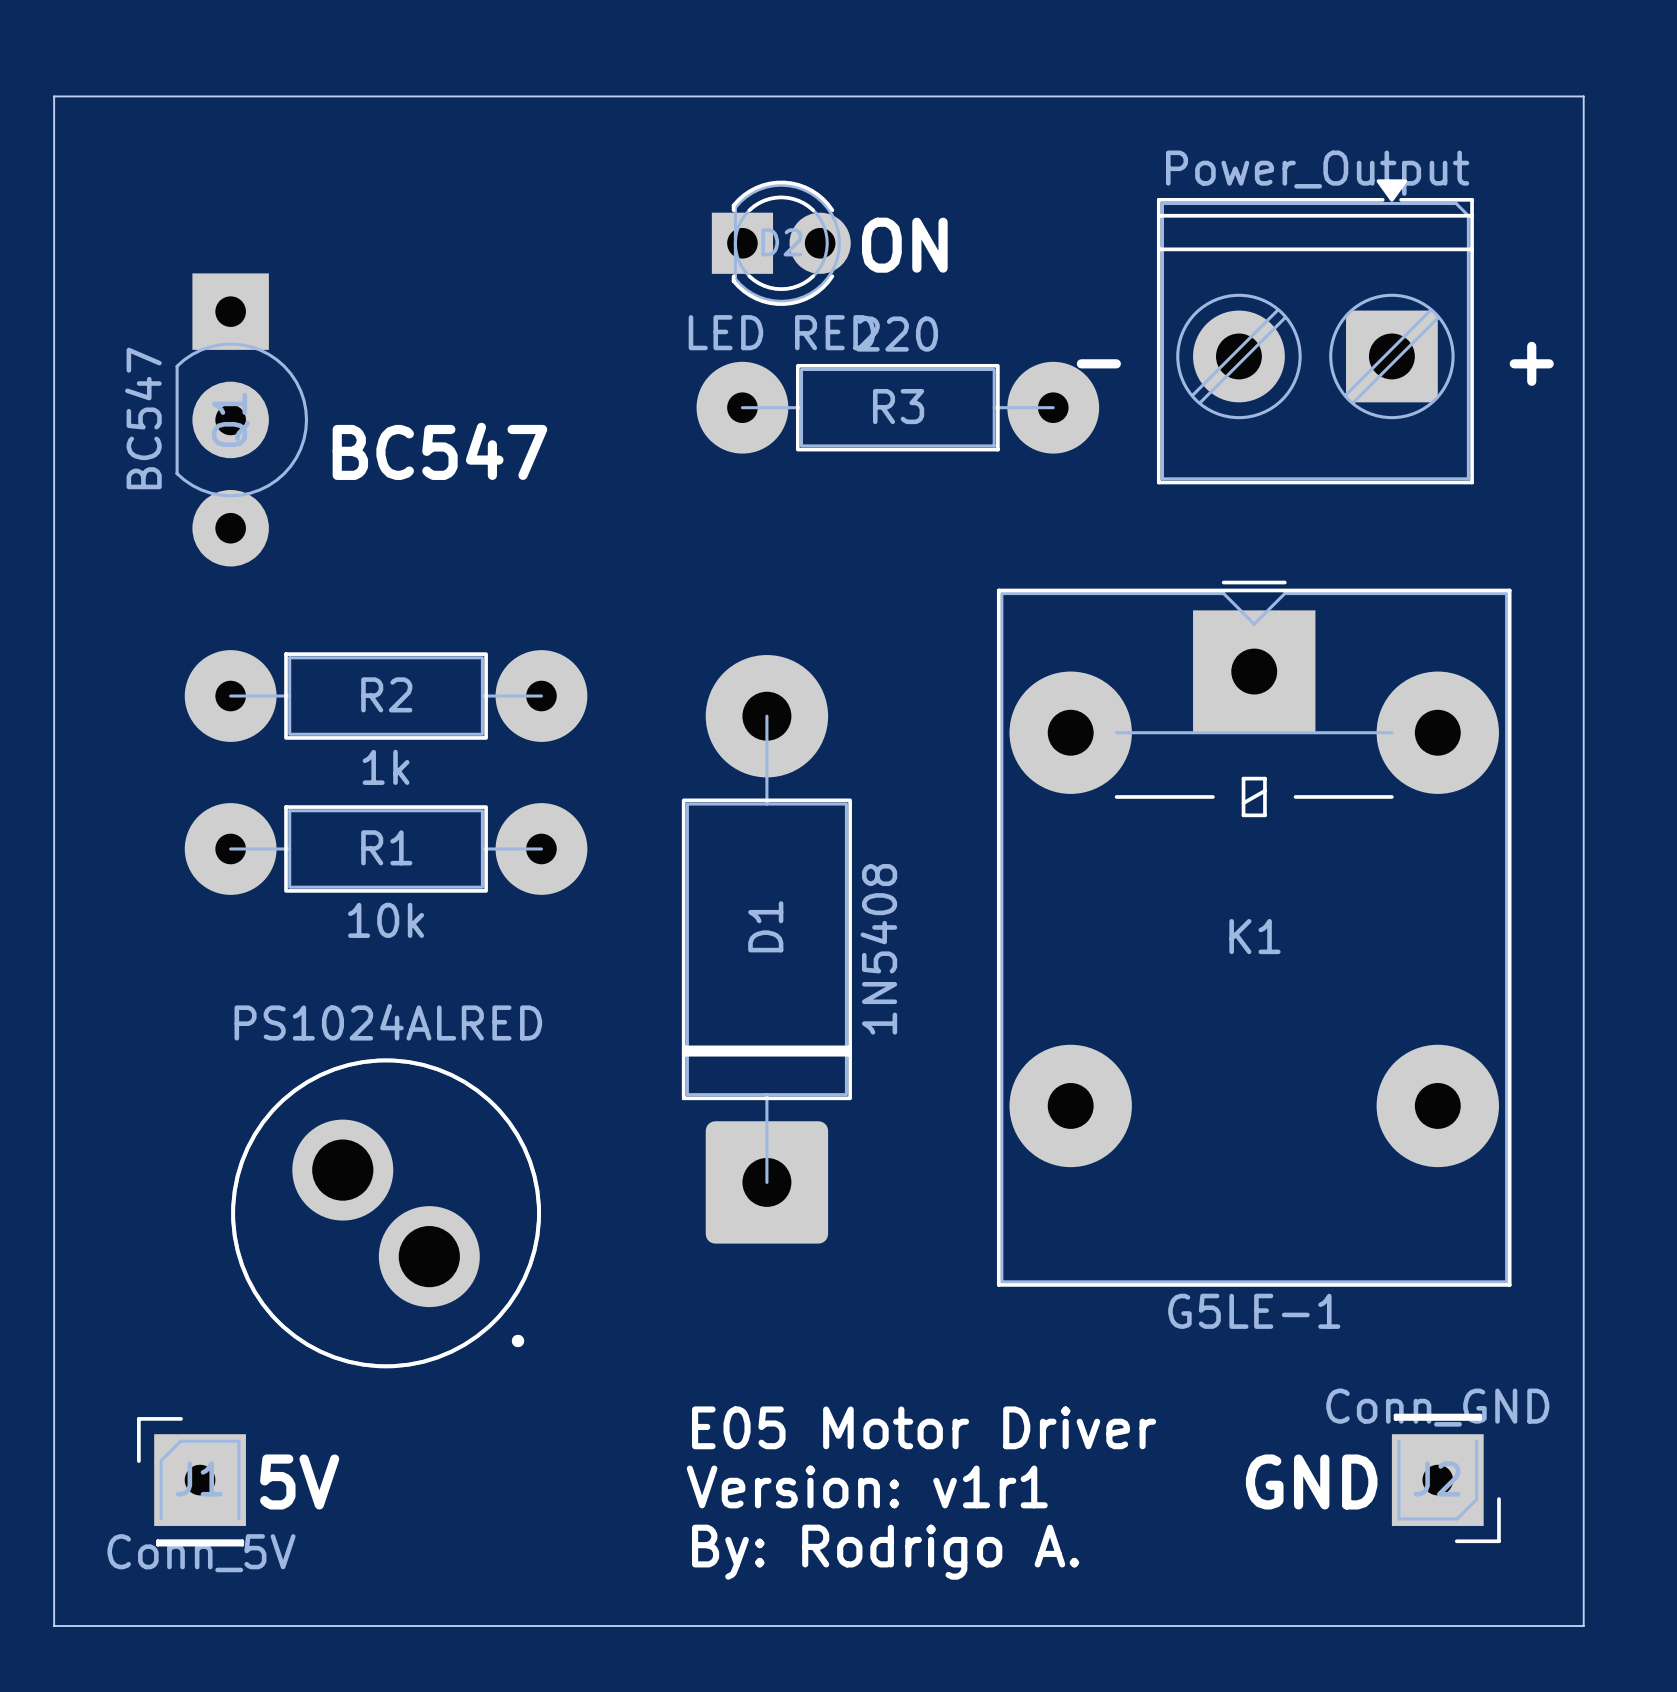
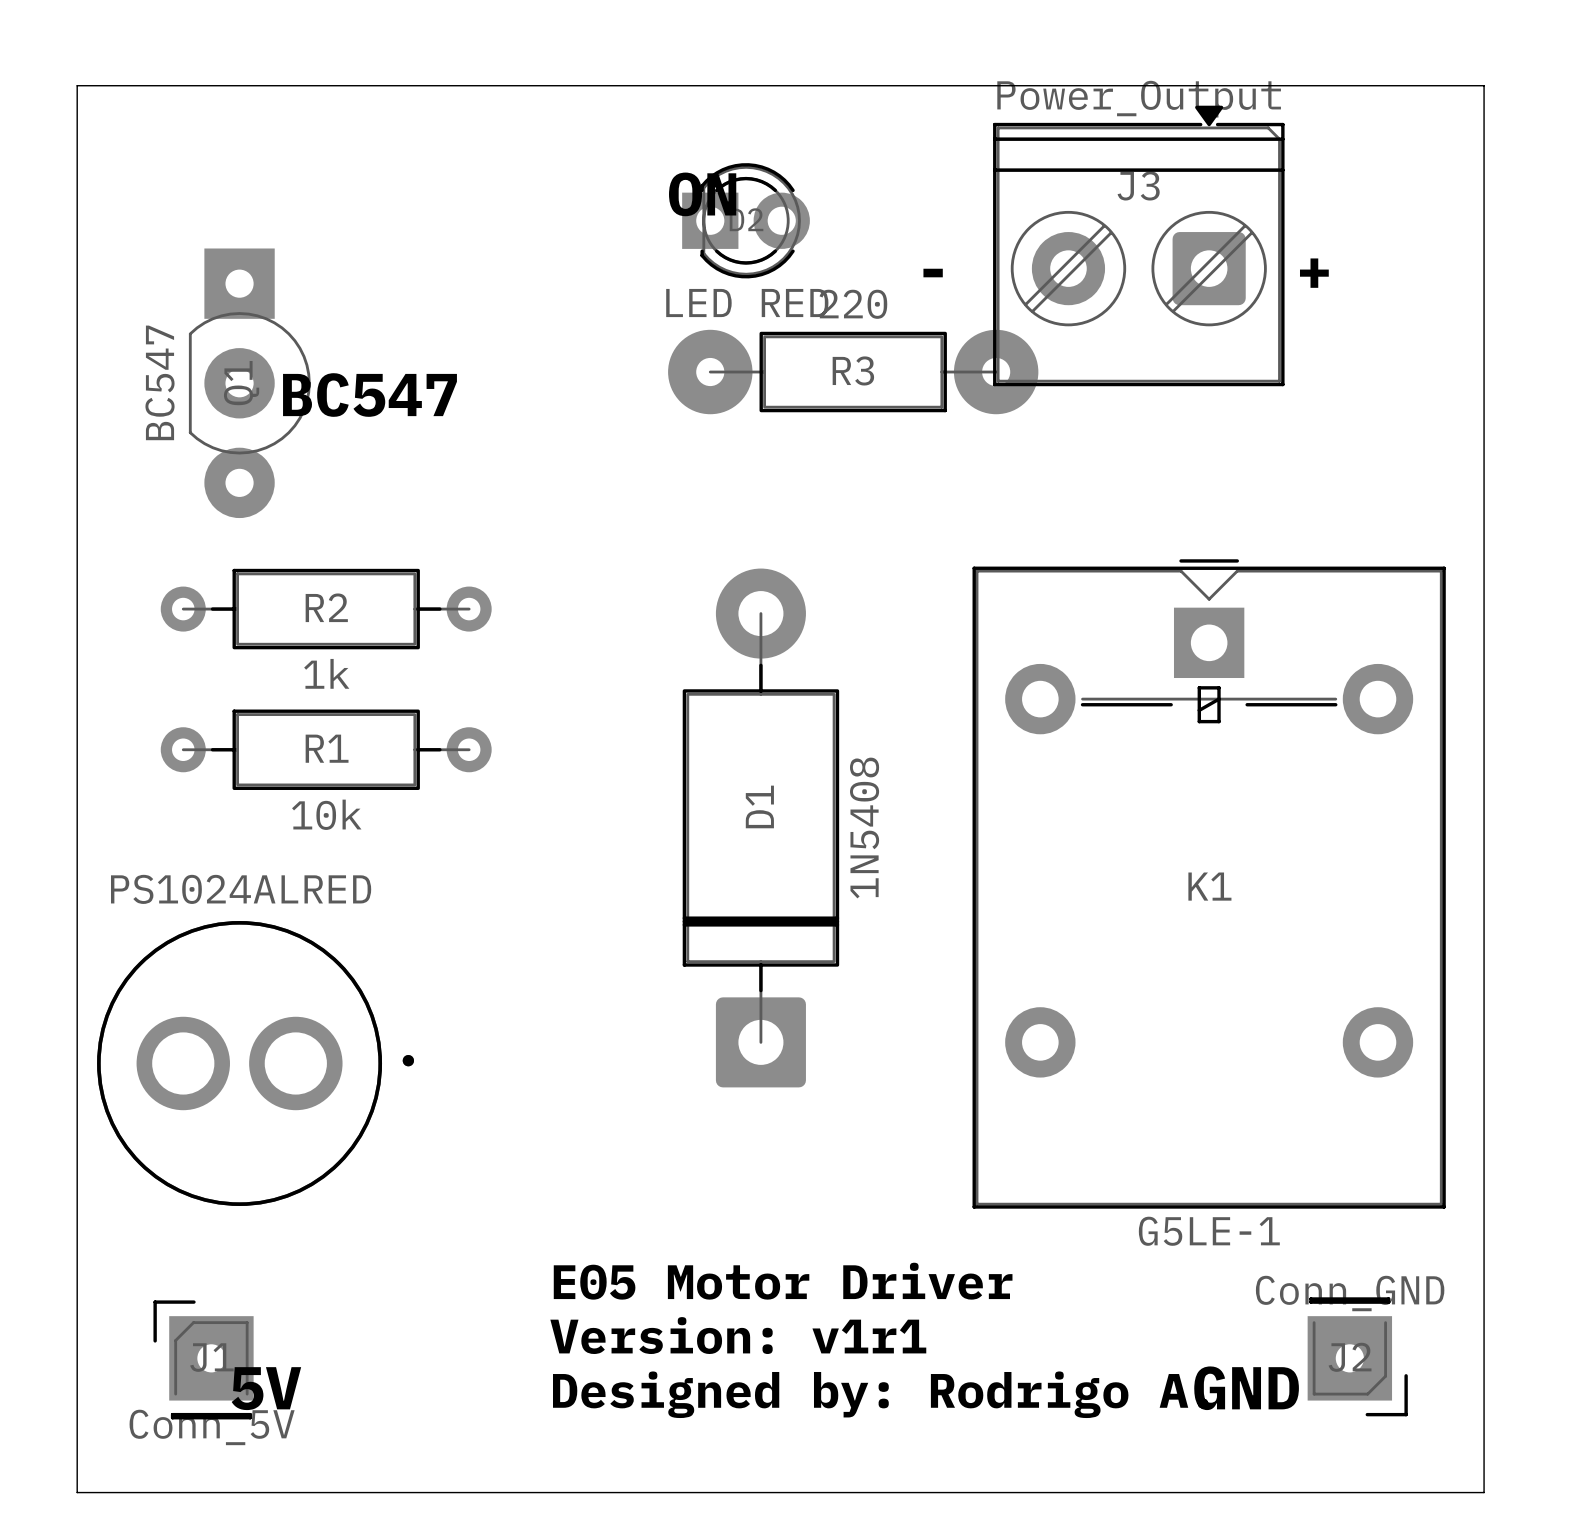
text position: ON (904, 245) -> ON (702, 194)
J3: none -> Power_Output (1138, 245)
part: Power_Output (1315, 331) -> none
text position: - (1098, 363) -> - (933, 273)
text position: + (1531, 363) -> + (1314, 273)
text position: BC547 (439, 451) -> BC547 (369, 395)
K1 footprint: [996, 580, 1512, 1287] -> [972, 559, 1446, 1209]
R2 footprint: [184, 650, 588, 742] -> [160, 568, 492, 650]
D1 footprint: [681, 655, 852, 1244] -> [682, 568, 840, 1088]
R1 footprint: [184, 803, 588, 895] -> [160, 709, 492, 790]
part: none -> PS1024ALRED (255, 1063)
part: PS1024ALRED (386, 1213) -> none
text position: E05 Motor Driver (924, 1427) -> E05 Motor Driver (783, 1281)
text position: 5V (299, 1481) -> 5V (266, 1388)
text position: GND (1311, 1481) -> GND (1246, 1388)
text position: Version: v1r1 (867, 1486) -> Version: v1r1 (738, 1335)
text: By: Rodrigo A. (885, 1552) -> Designed by: Rodrigo A. (880, 1394)

